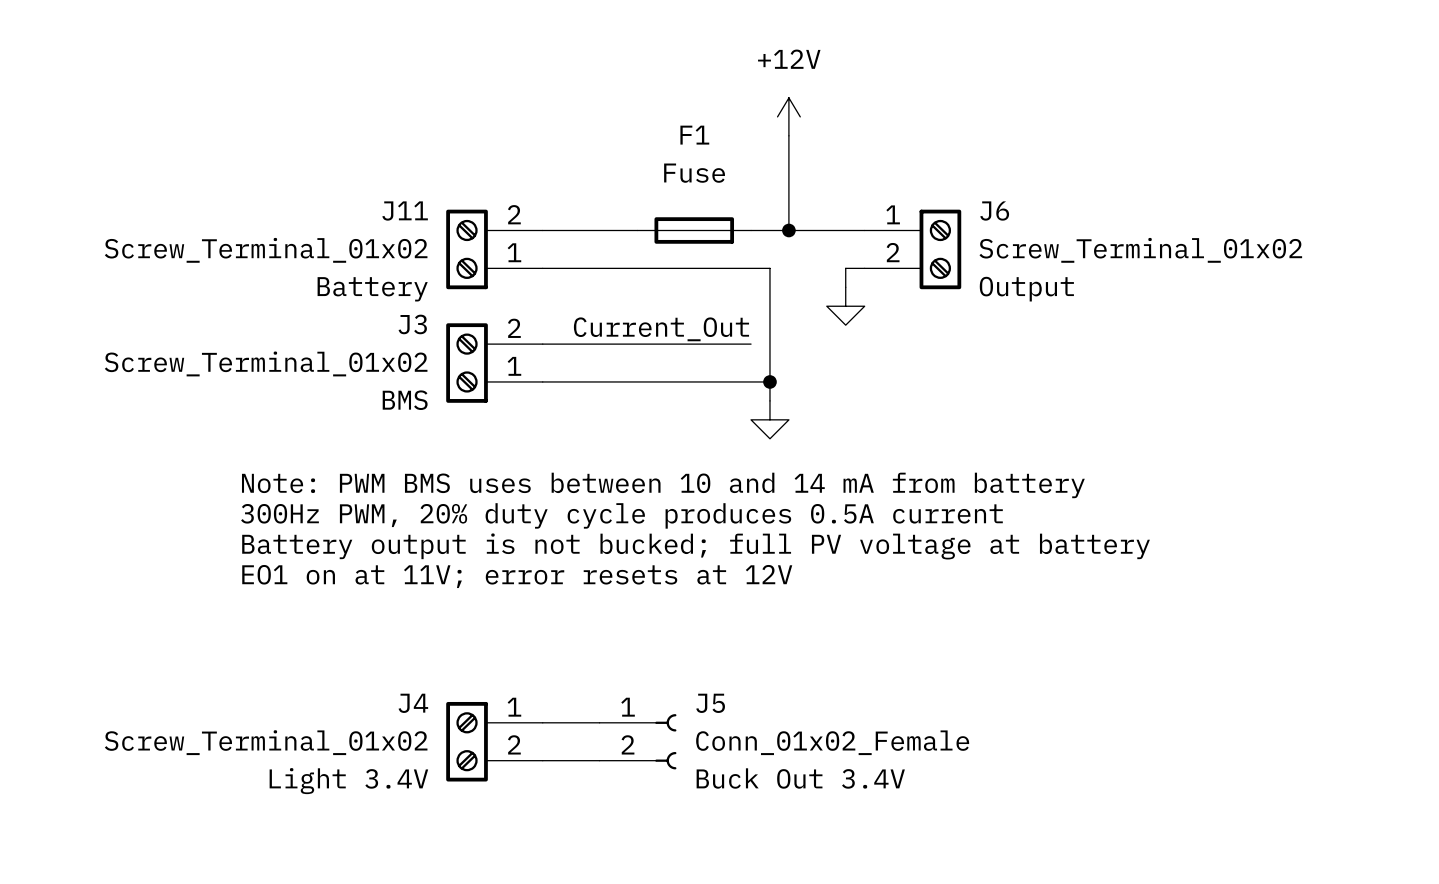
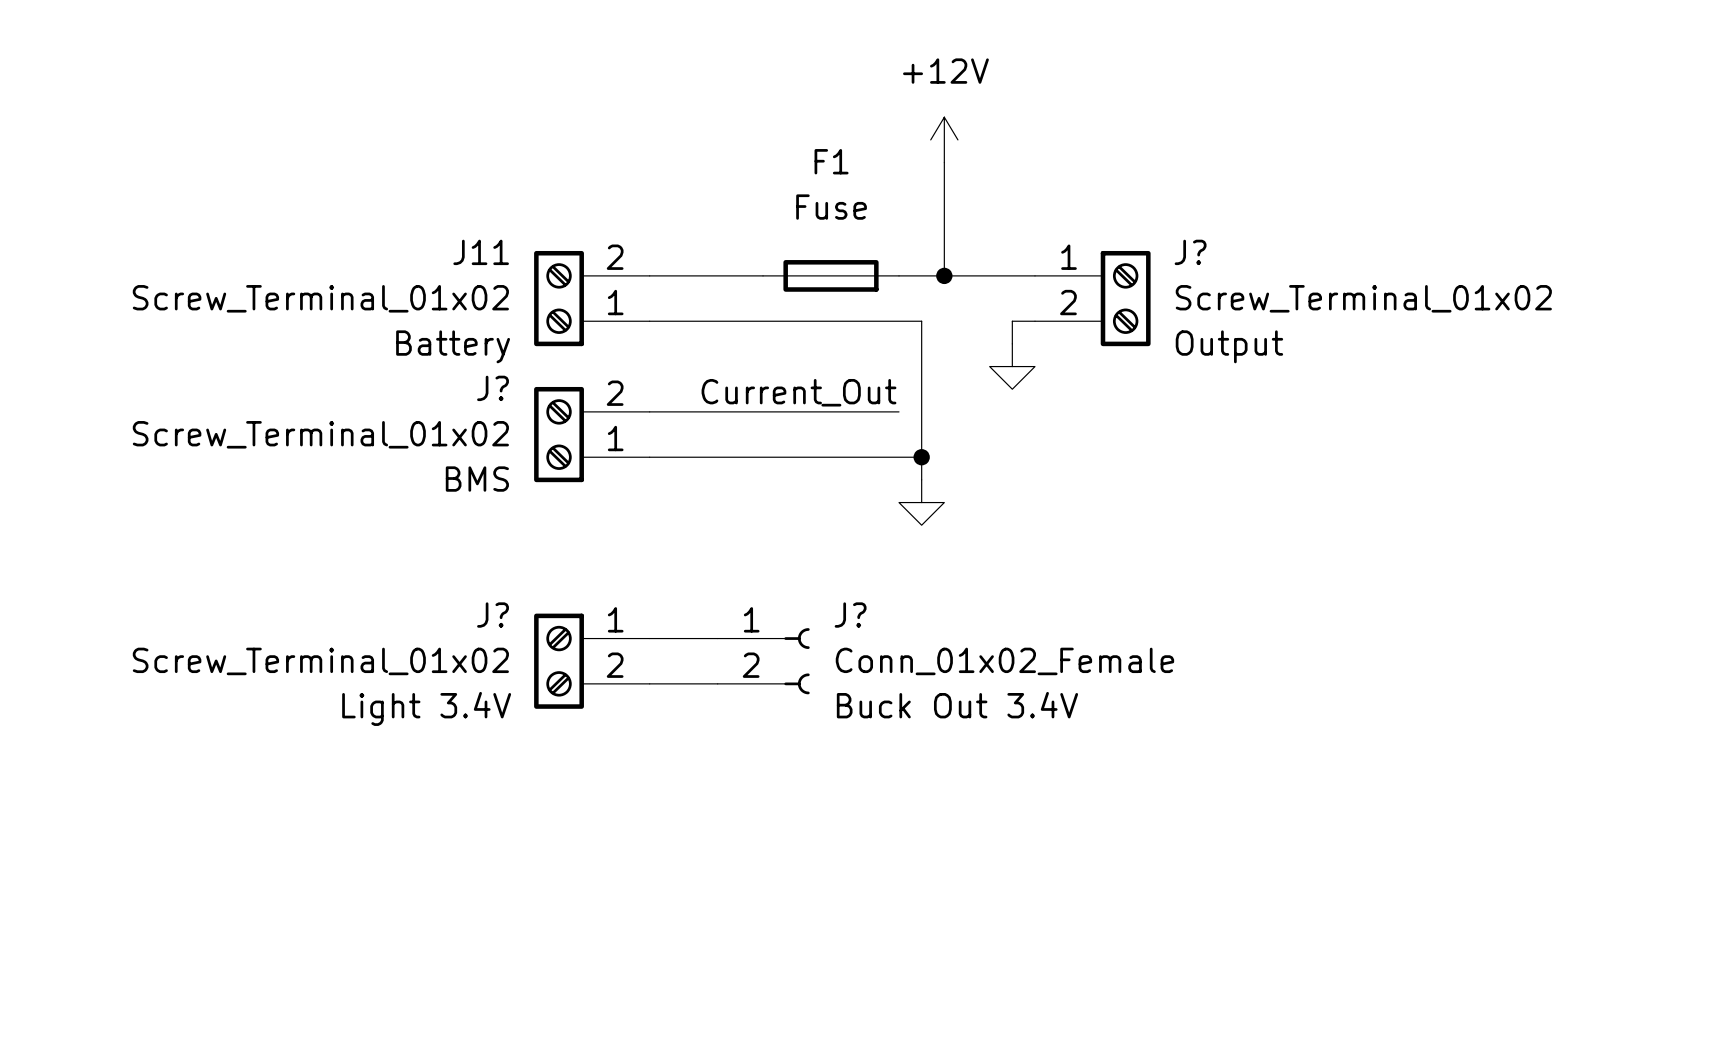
J6 name: J6 (994, 211) -> J? (1190, 252)
J3 name: J3 (412, 324) -> J? (493, 388)
text: Note: PWM BMS uses between 10 and 14 mA from battery (663, 485) -> none
text: 300Hz PWM, 20% duty cycle produces 0.5A current (621, 515) -> none
text: Battery output is not bucked; full PV voltage at battery (696, 546) -> none
J?: none -> Screw_Terminal_01x02 (591, 661)
J?: none -> Conn_01x02_Female (763, 661)
text: EO1 on at 11V; error resets at 12V (517, 576) -> none
wire: (542, 722) (599, 722) -> (649, 683) (717, 683)
J4: Screw_Terminal_01x02 (494, 741) -> none
J5: Conn_01x02_Female (638, 741) -> none
wire: (542, 760) (599, 760) -> (649, 638) (717, 638)

